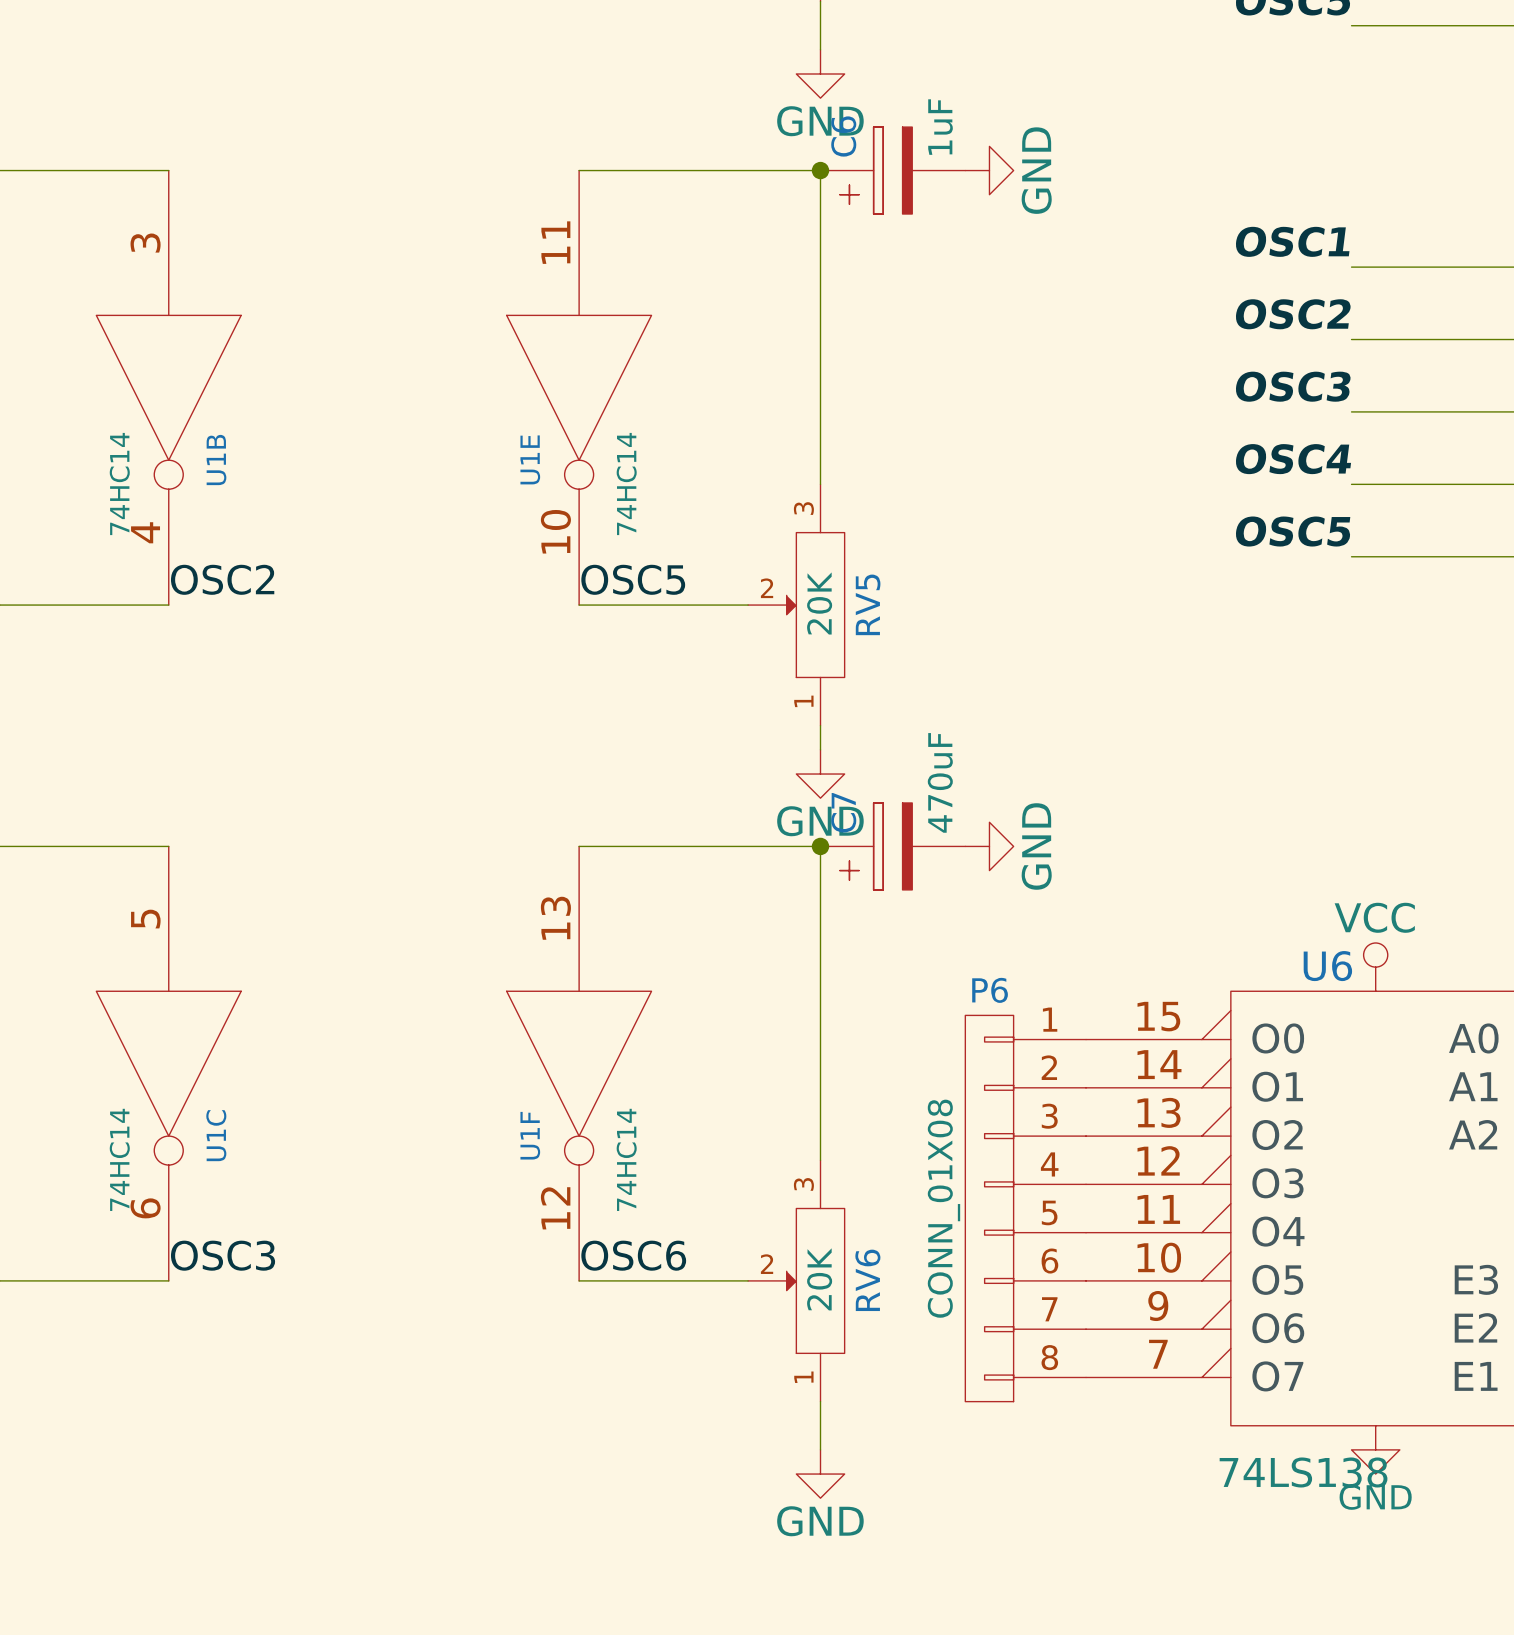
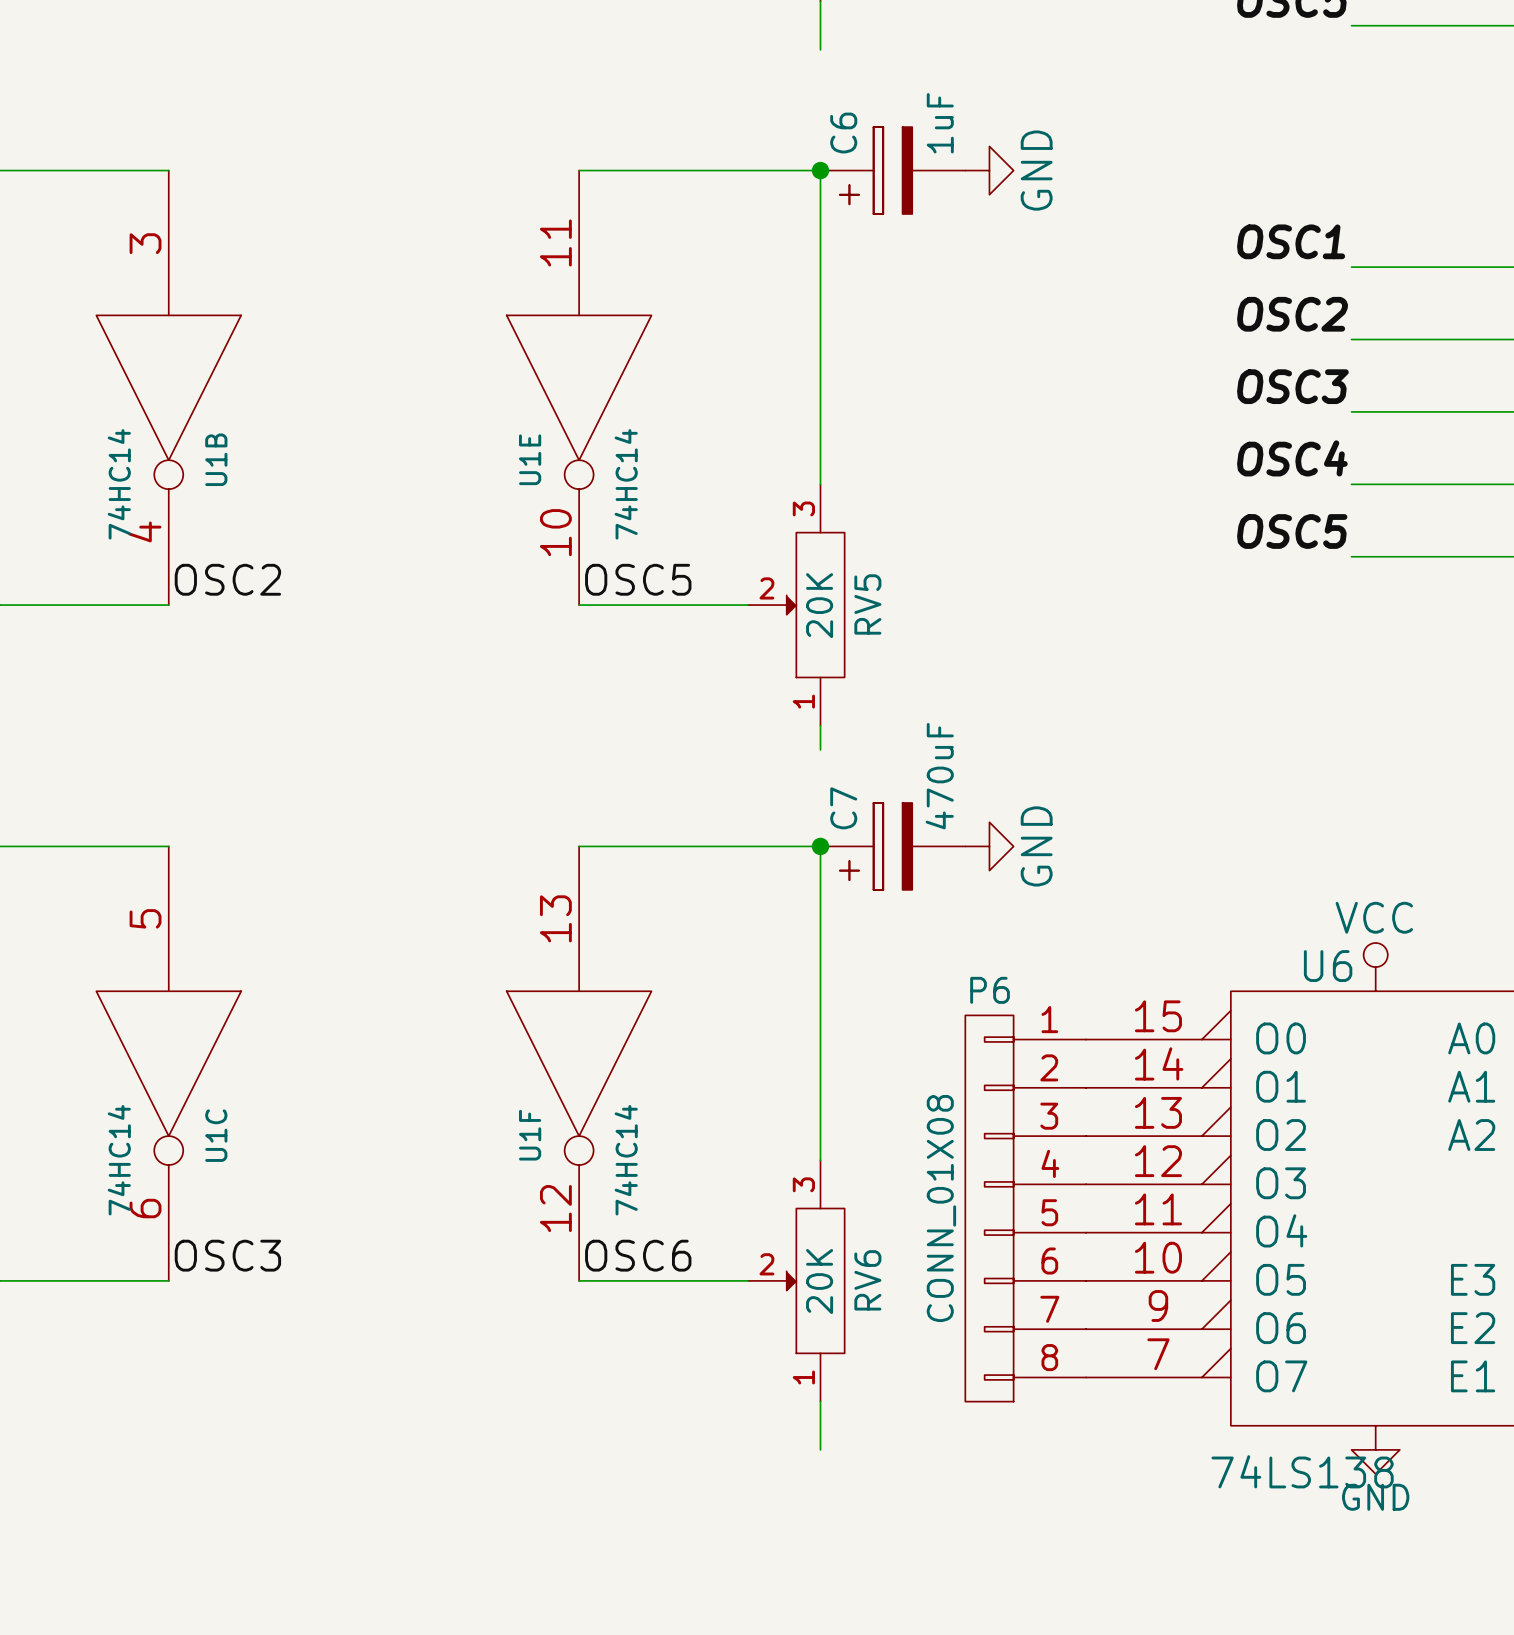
power symbol: GND (820, 73) -> none
power symbol: GND (820, 774) -> none
power symbol: GND (820, 1474) -> none

